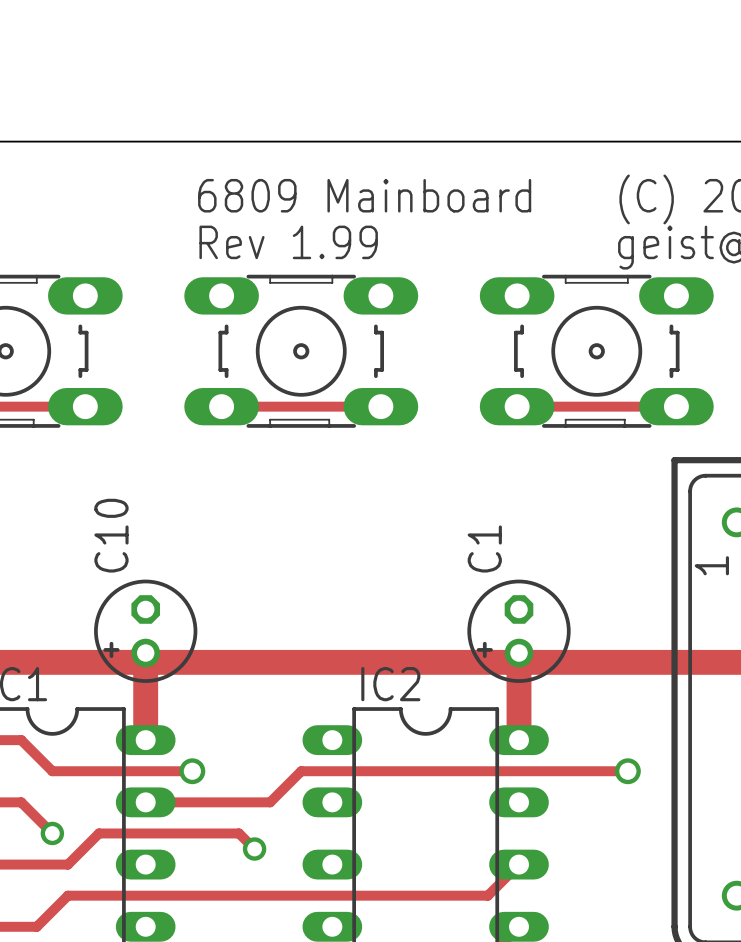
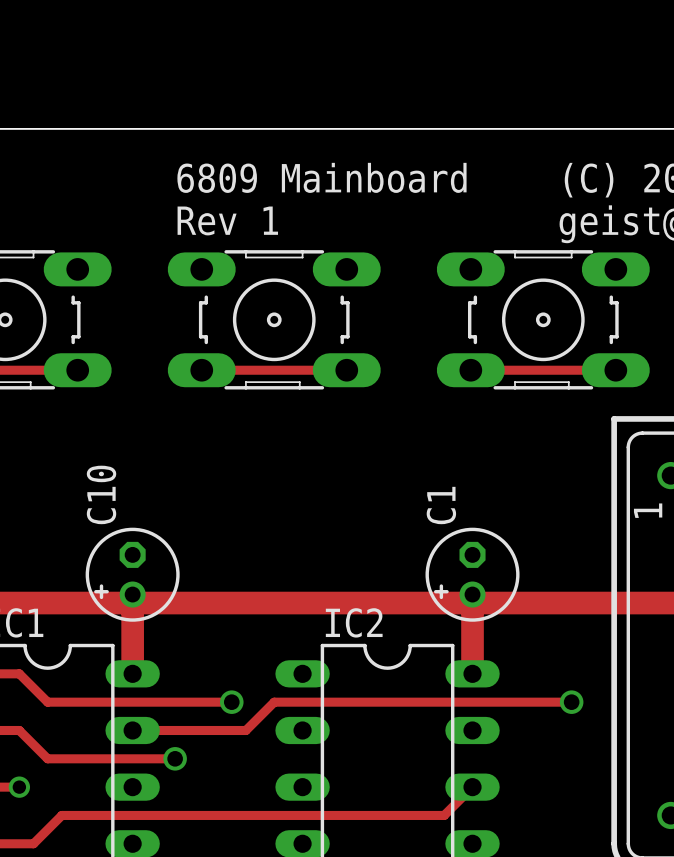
text: Rev 1.99 (288, 242) -> Rev 1 (227, 220)
track: none -> (175, 702) (231, 702)
via: (192, 771) -> none
via: none -> (231, 702)
via position: (52, 833) -> (19, 787)
track: (99, 833) (67, 864) (21, 864) -> (90, 758) (47, 758)
track: (192, 833) (239, 833) (254, 849) -> none
via: none -> (175, 758)
via: (254, 849) -> none

